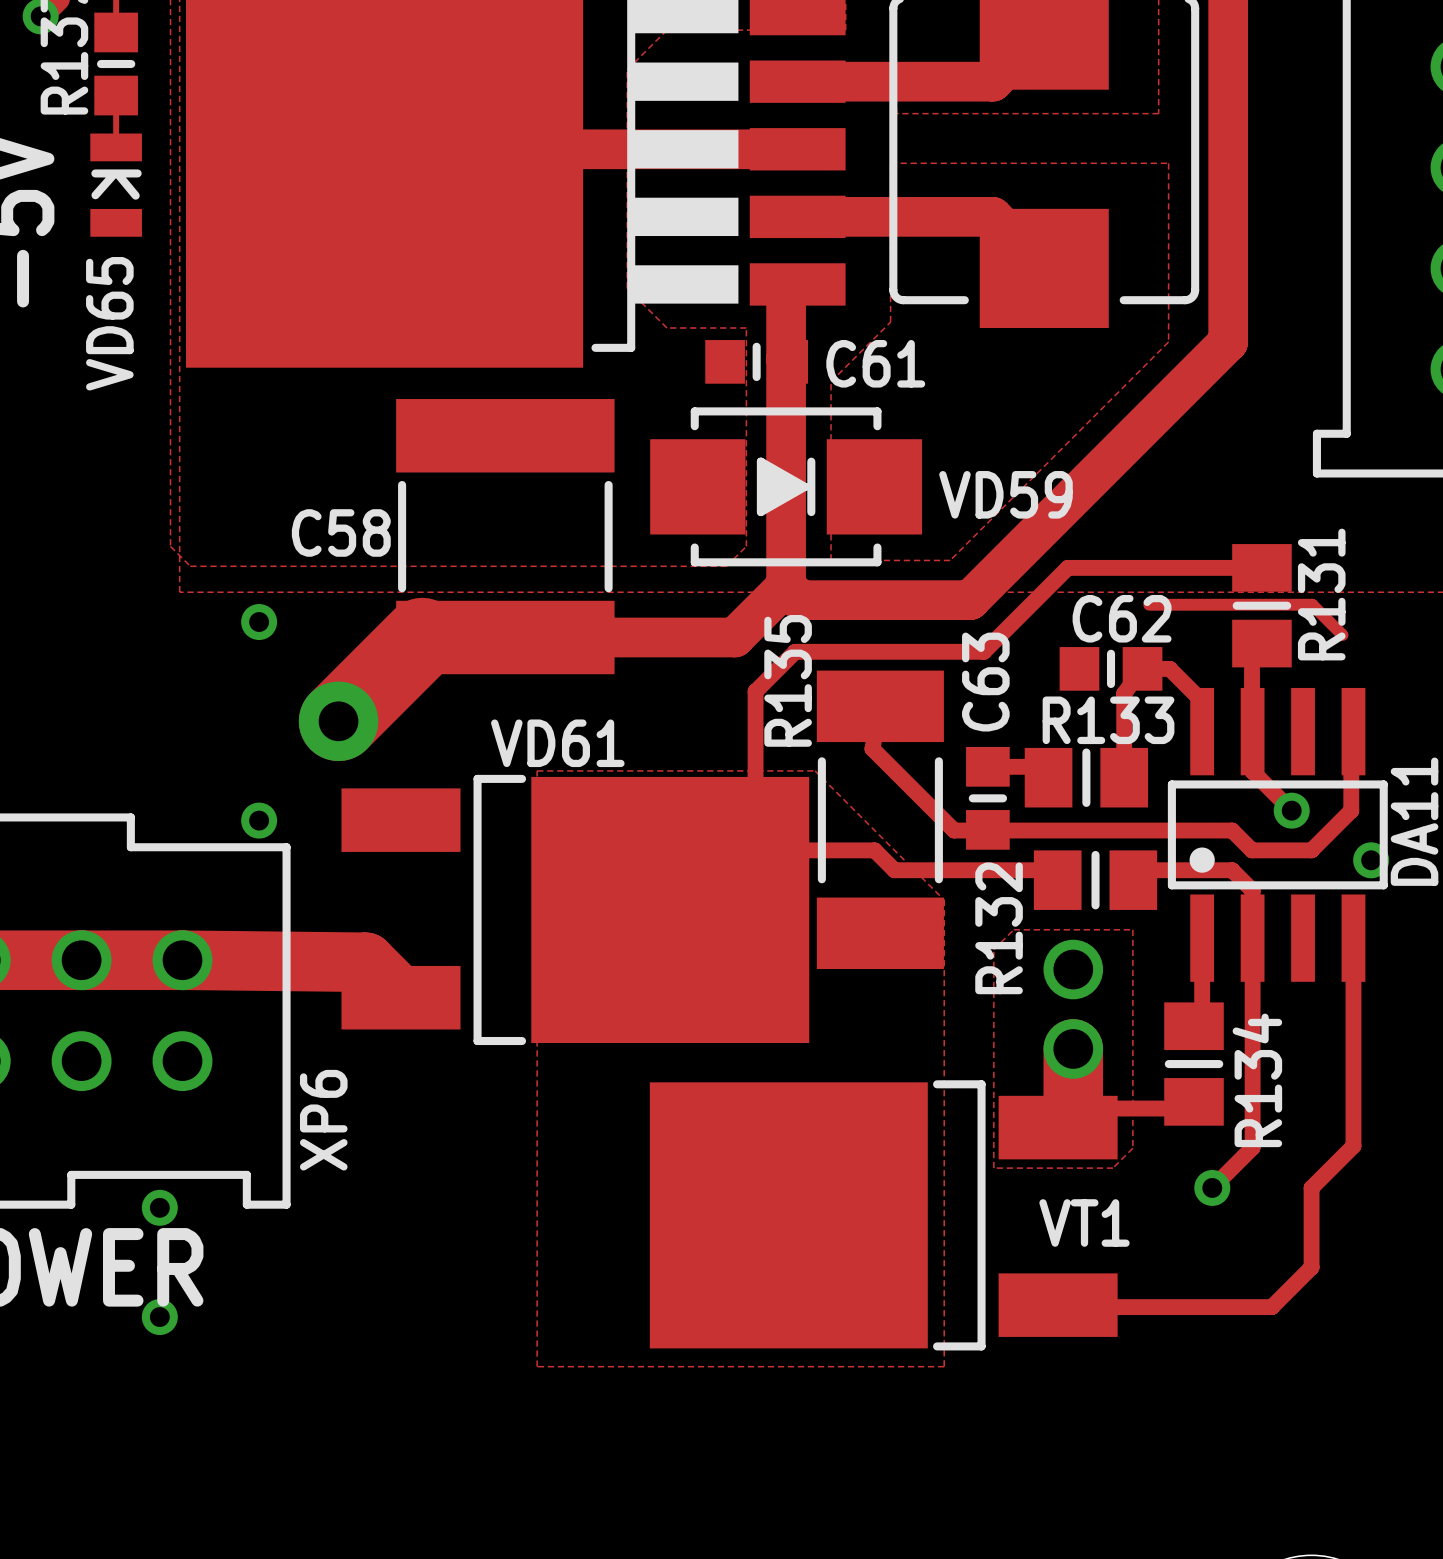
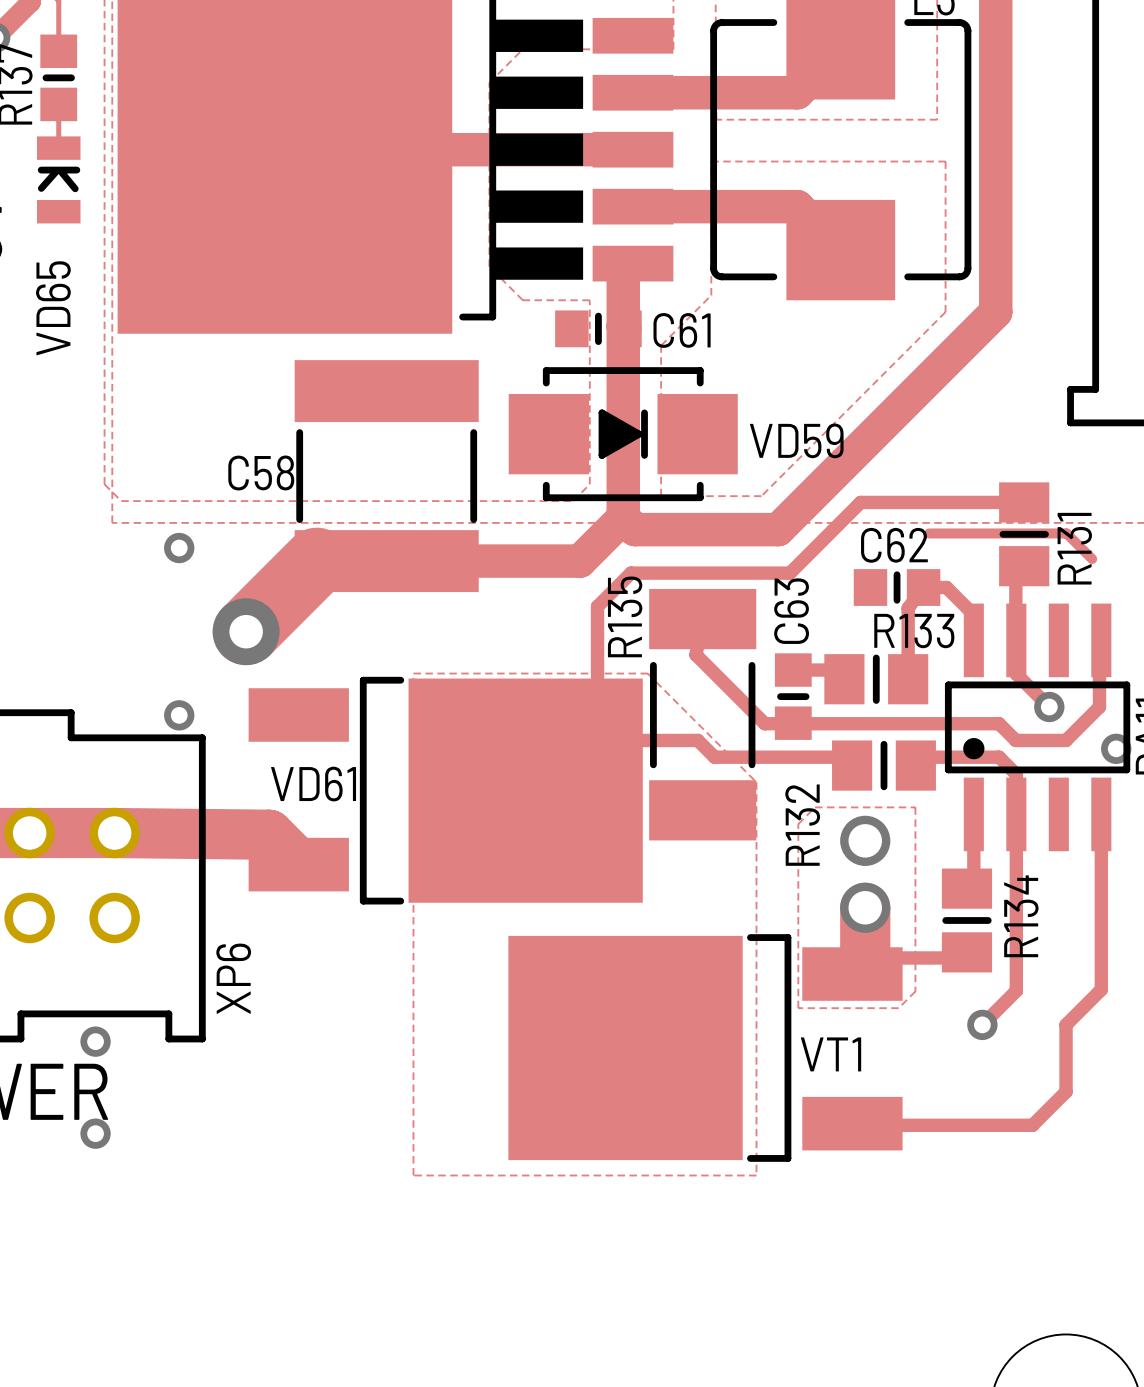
VD61 name position: VD61 (557, 743) -> VD61 (313, 784)
VT1 name position: VT1 (1084, 1222) -> VT1 (831, 1054)

